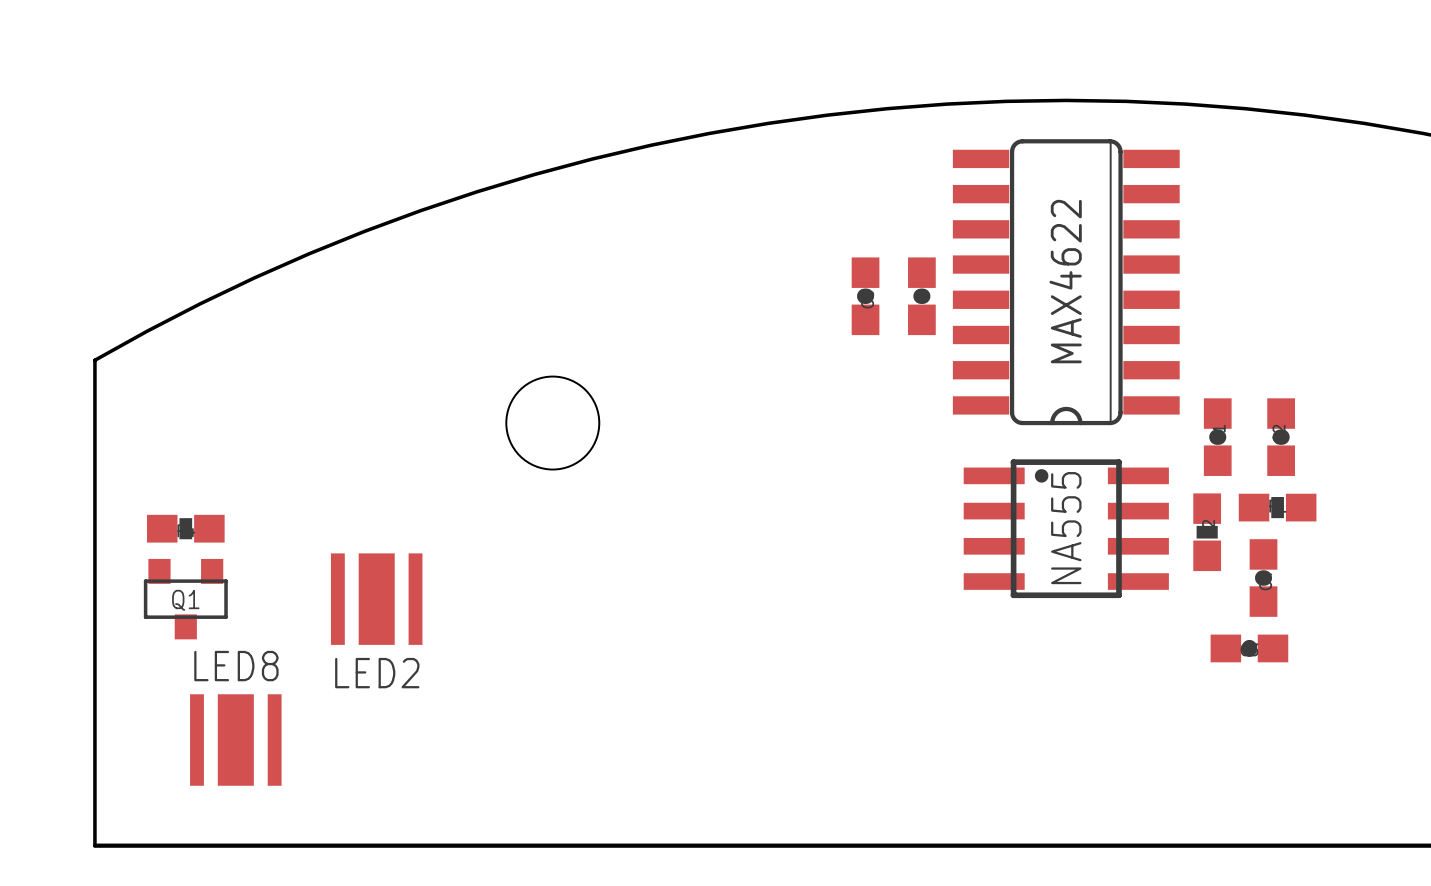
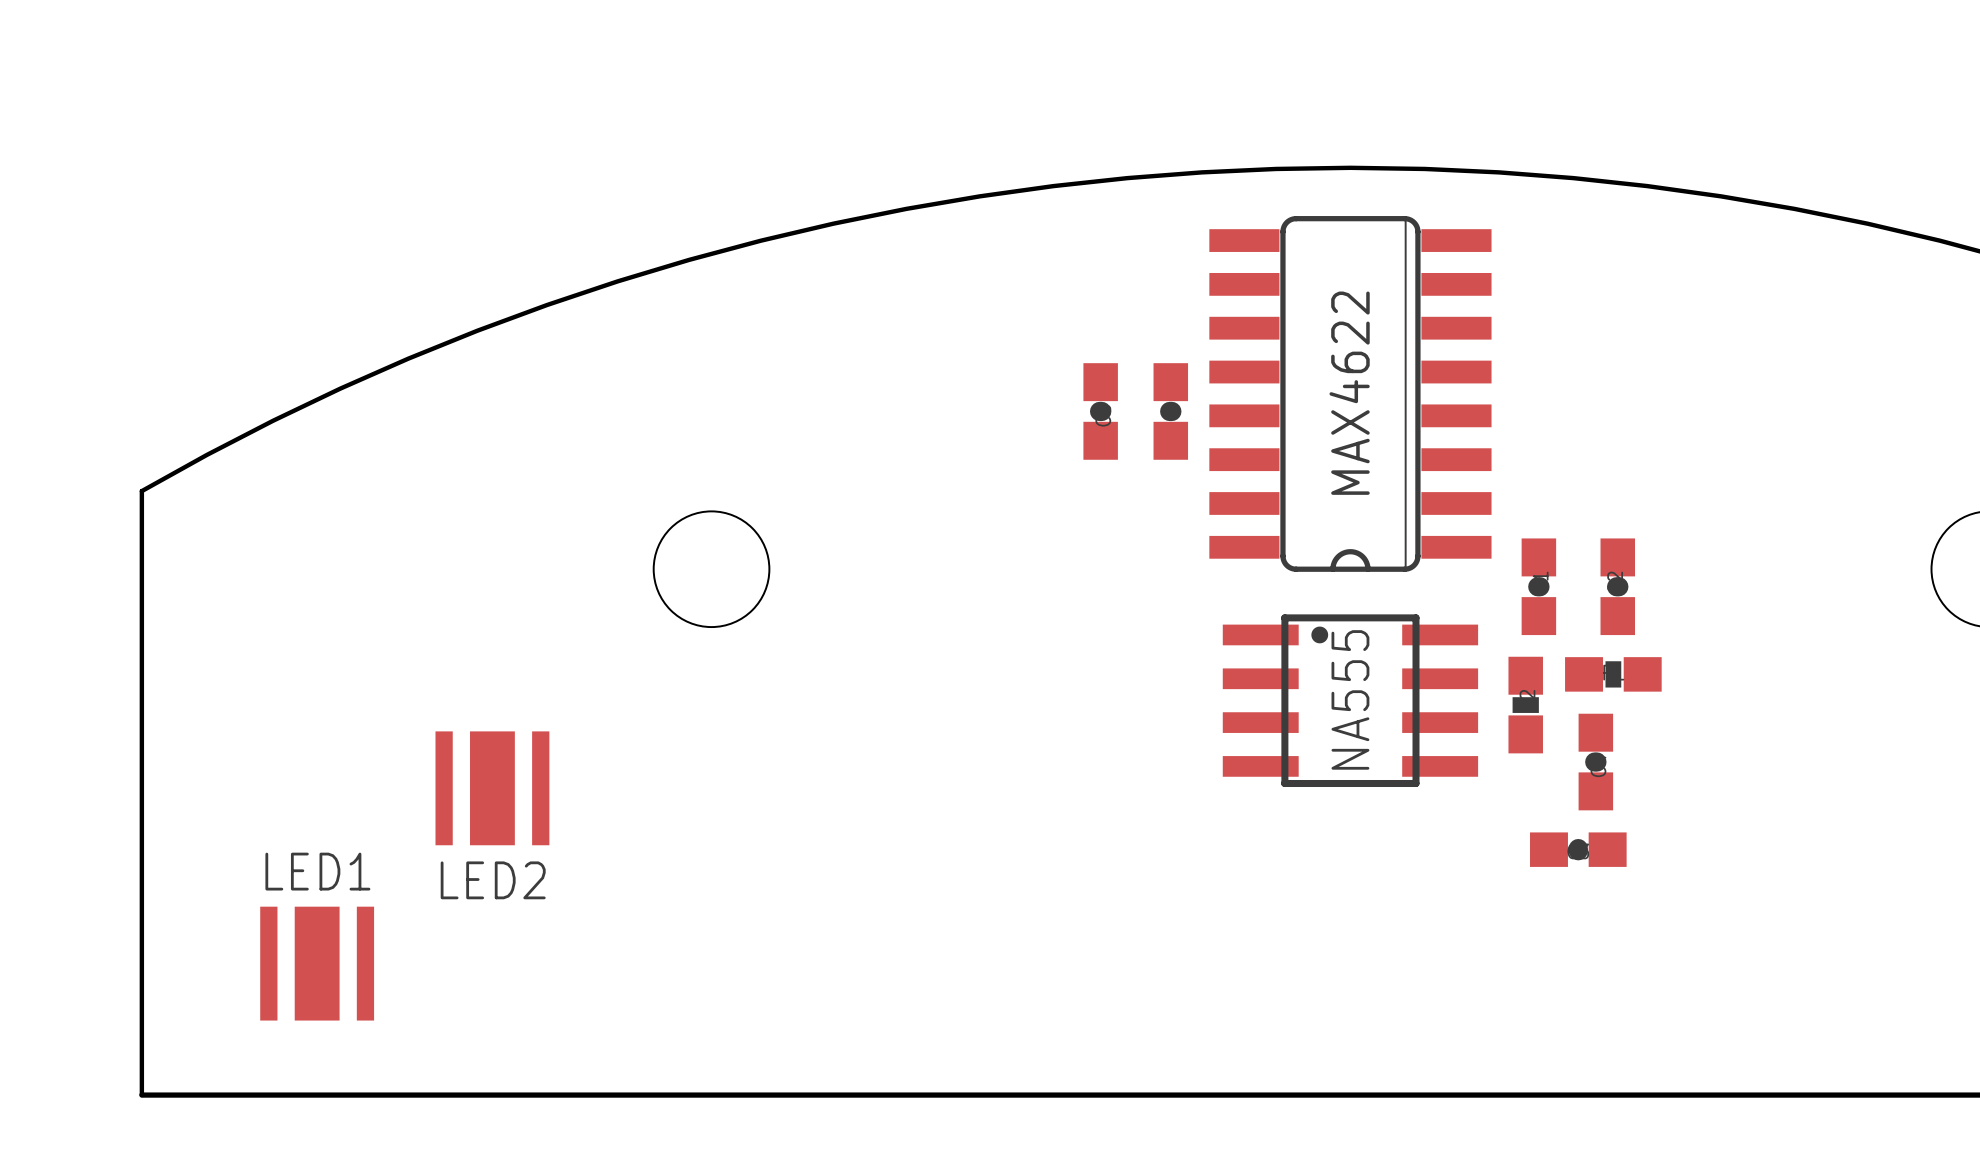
part: (185, 528) -> none
Q1: (185, 599) -> none
LED8 name: LED8 (236, 666) -> LED1 (317, 871)

